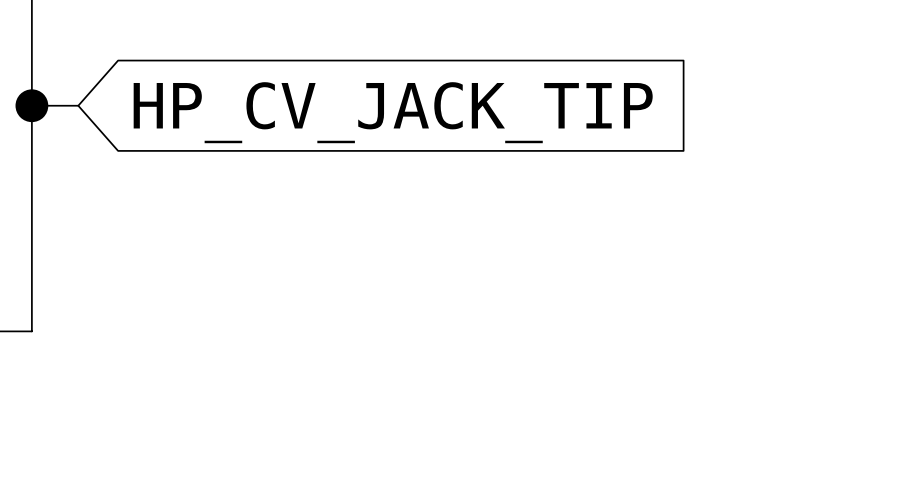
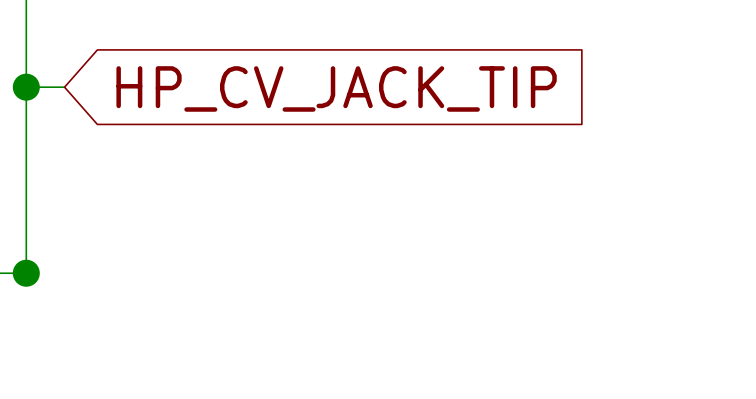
junction: none -> (26, 273)

